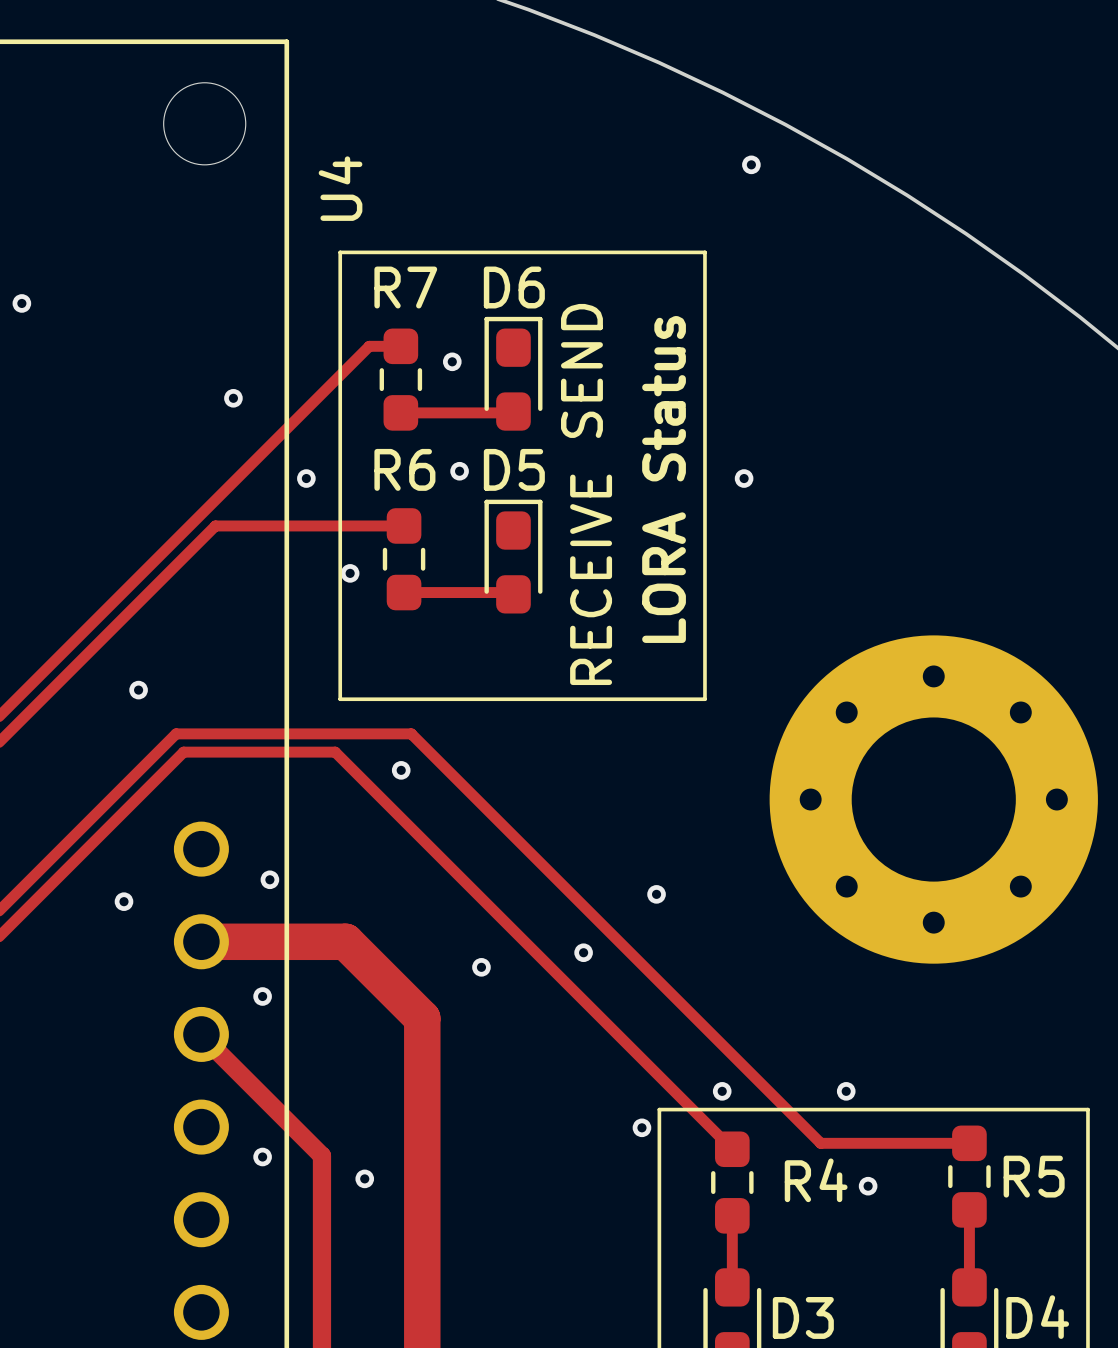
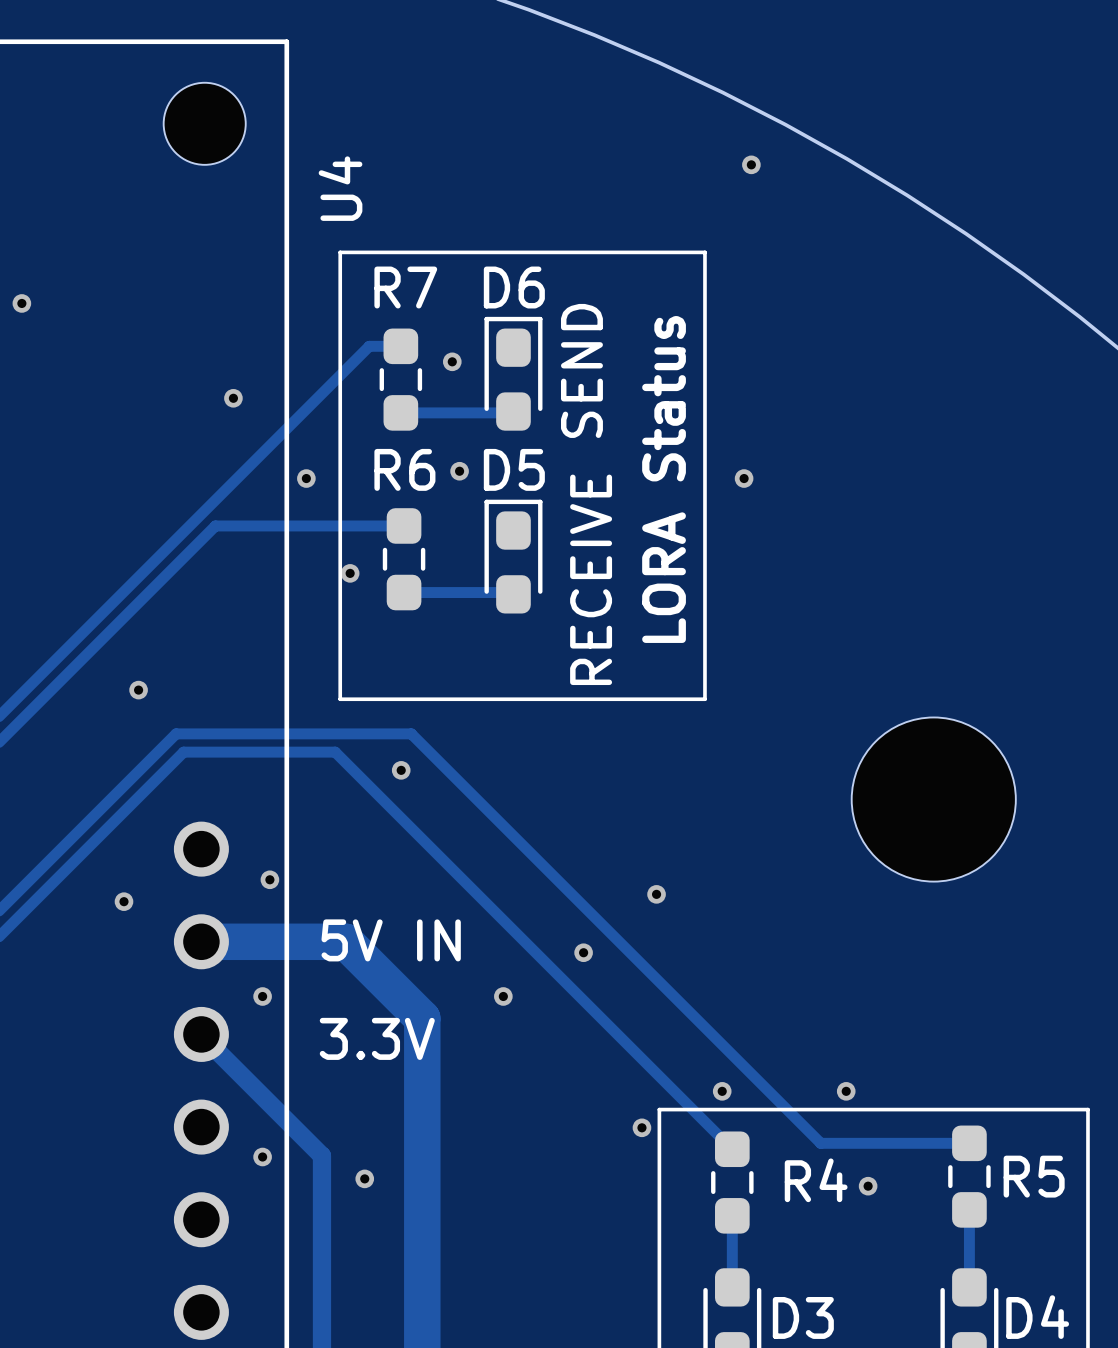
part footprint: [769, 635, 1098, 964] -> [851, 717, 1016, 882]
text: none -> 5V IN (391, 940)
via position: (481, 967) -> (503, 996)
text: none -> 3.3V (377, 1038)

